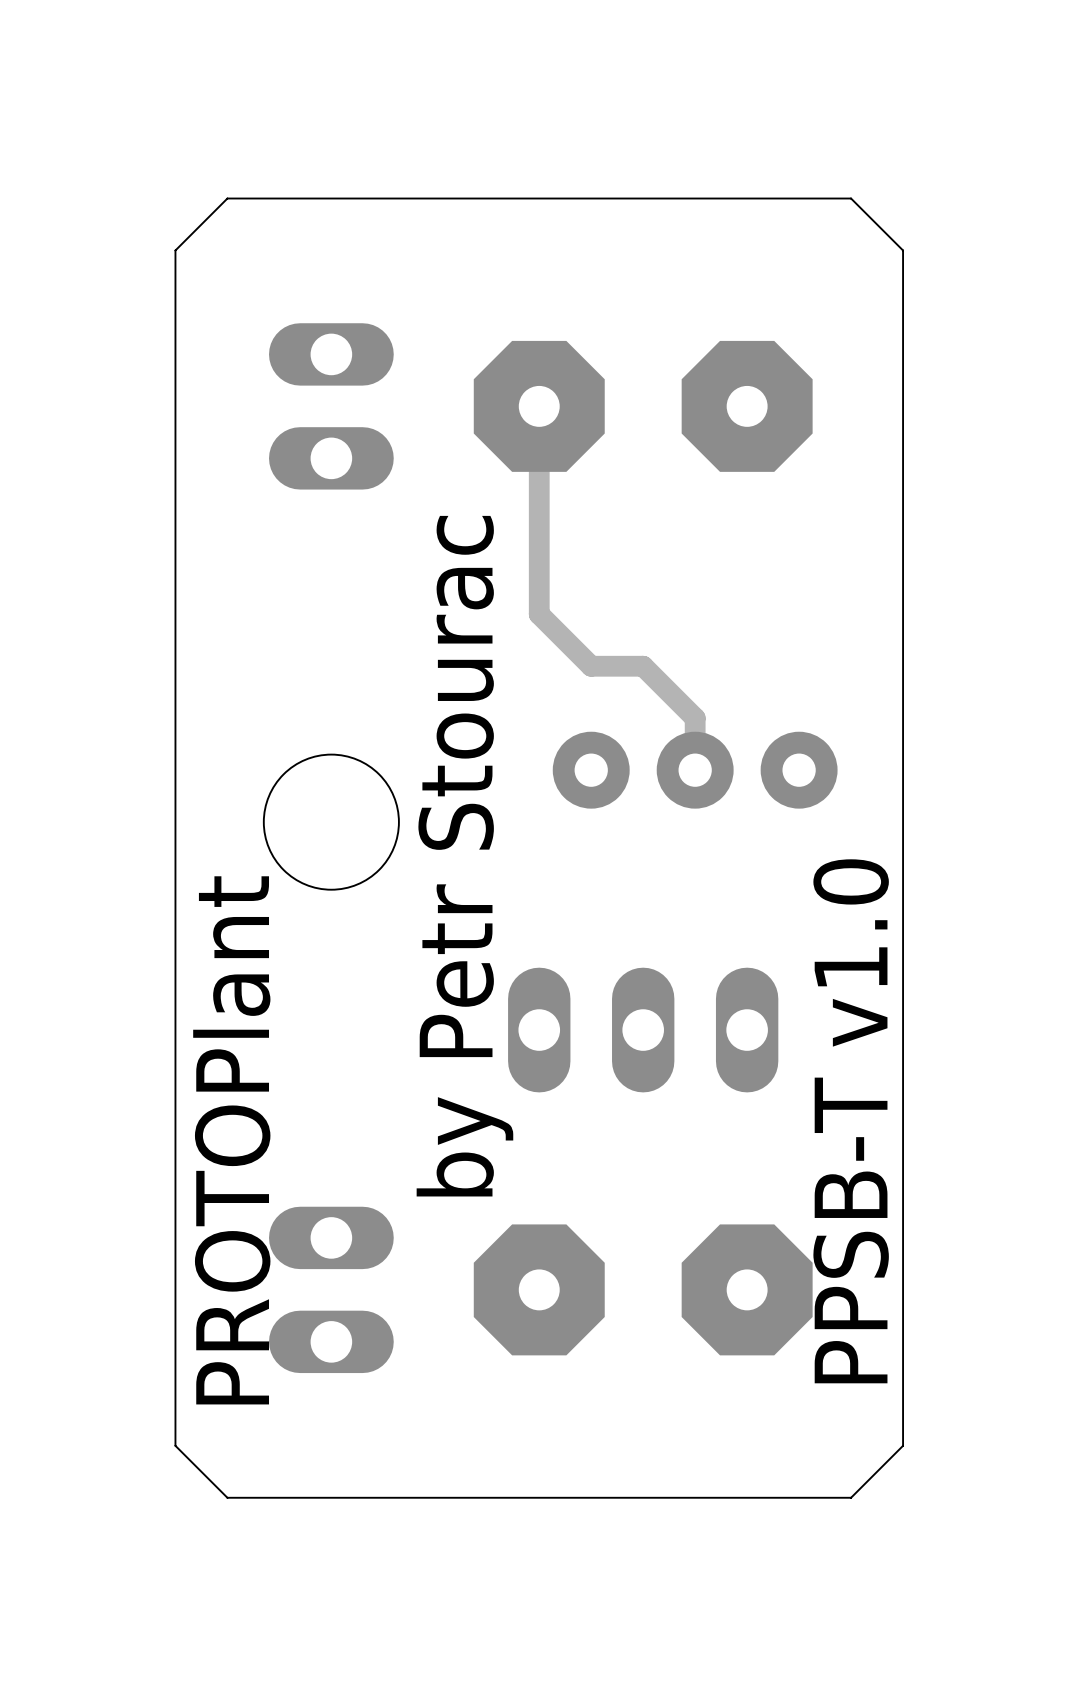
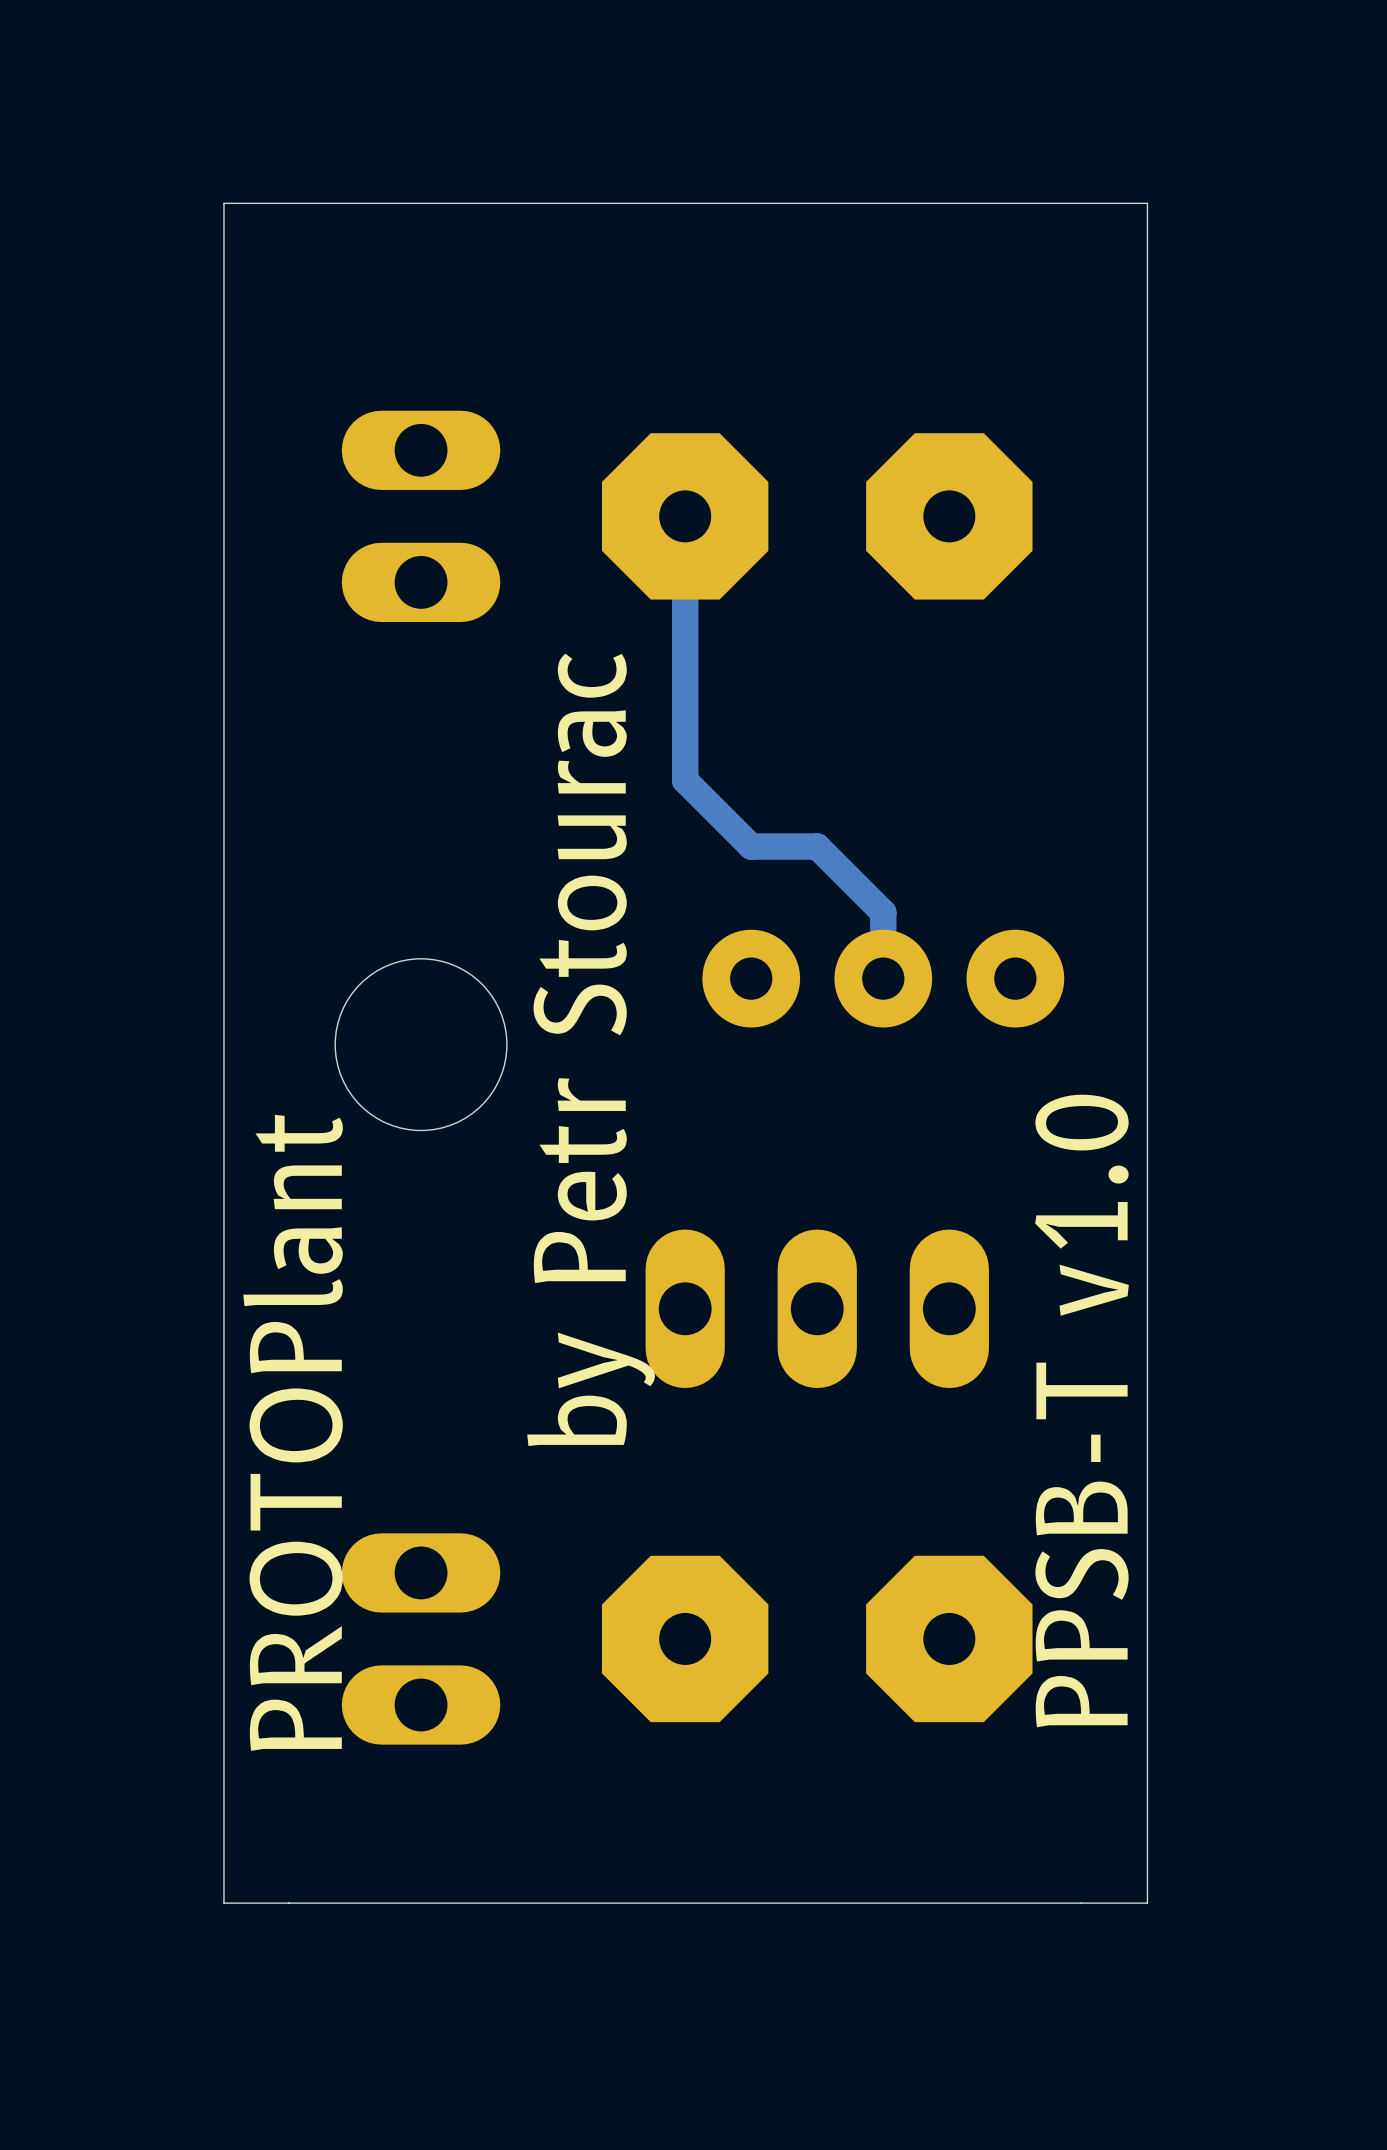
board edge: (903, 250) (851, 198) (227, 198) (175, 250) (175, 1445) (227, 1497) -> (1147, 318) (1147, 203) (223, 203) (223, 1903) (288, 1903)
board edge: (903, 1445) (851, 1497) -> (1147, 1837) (1147, 1903) (1081, 1903)

